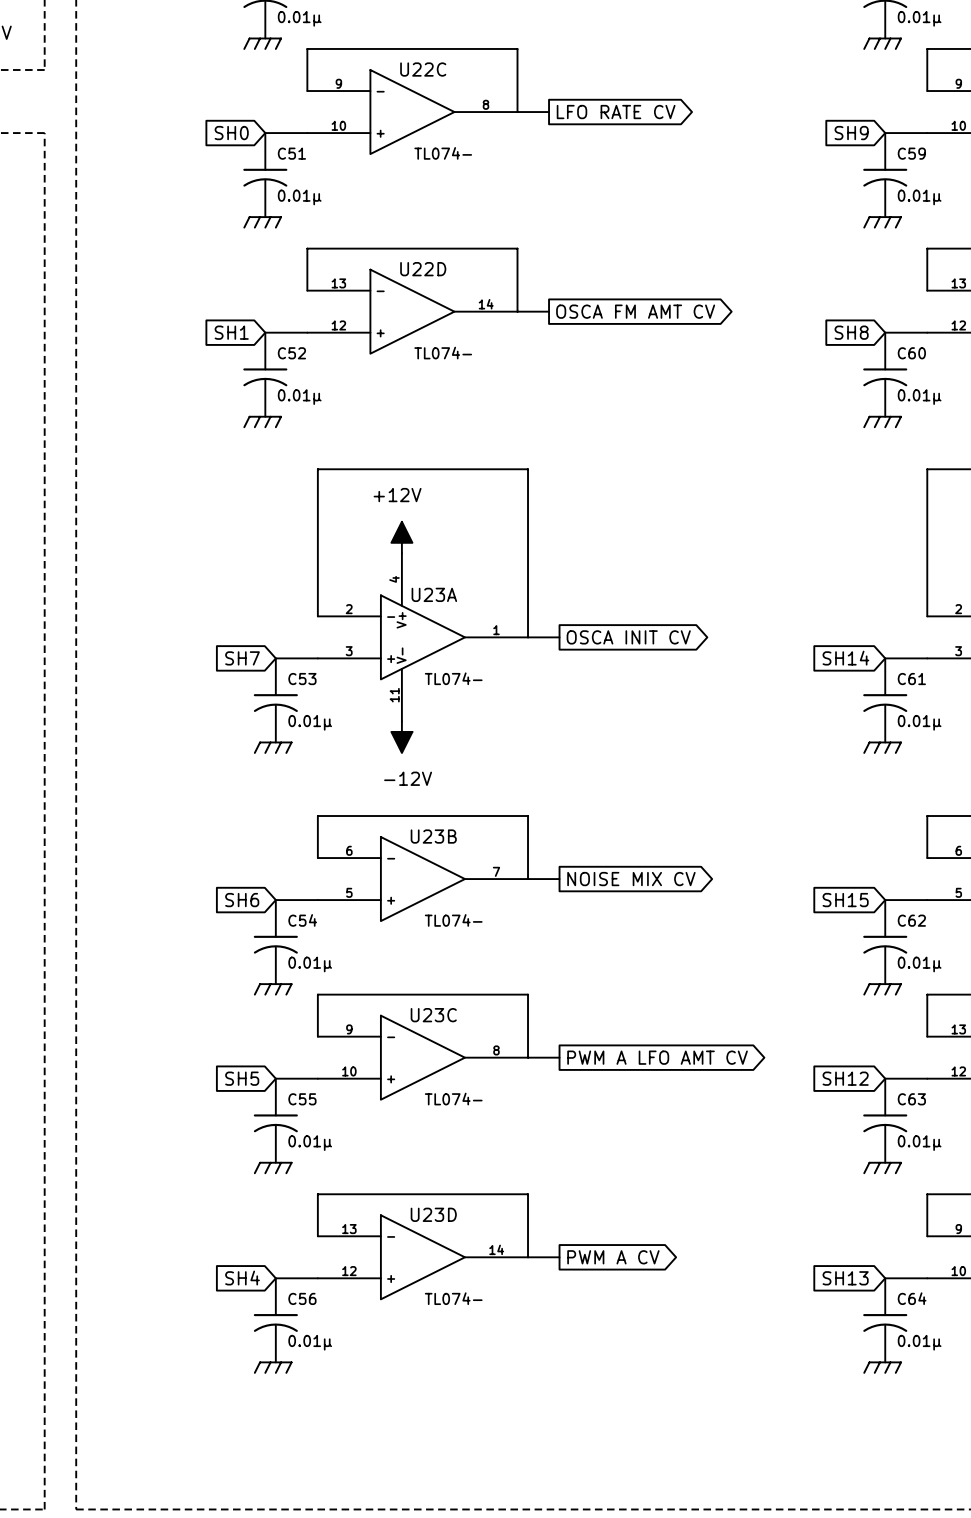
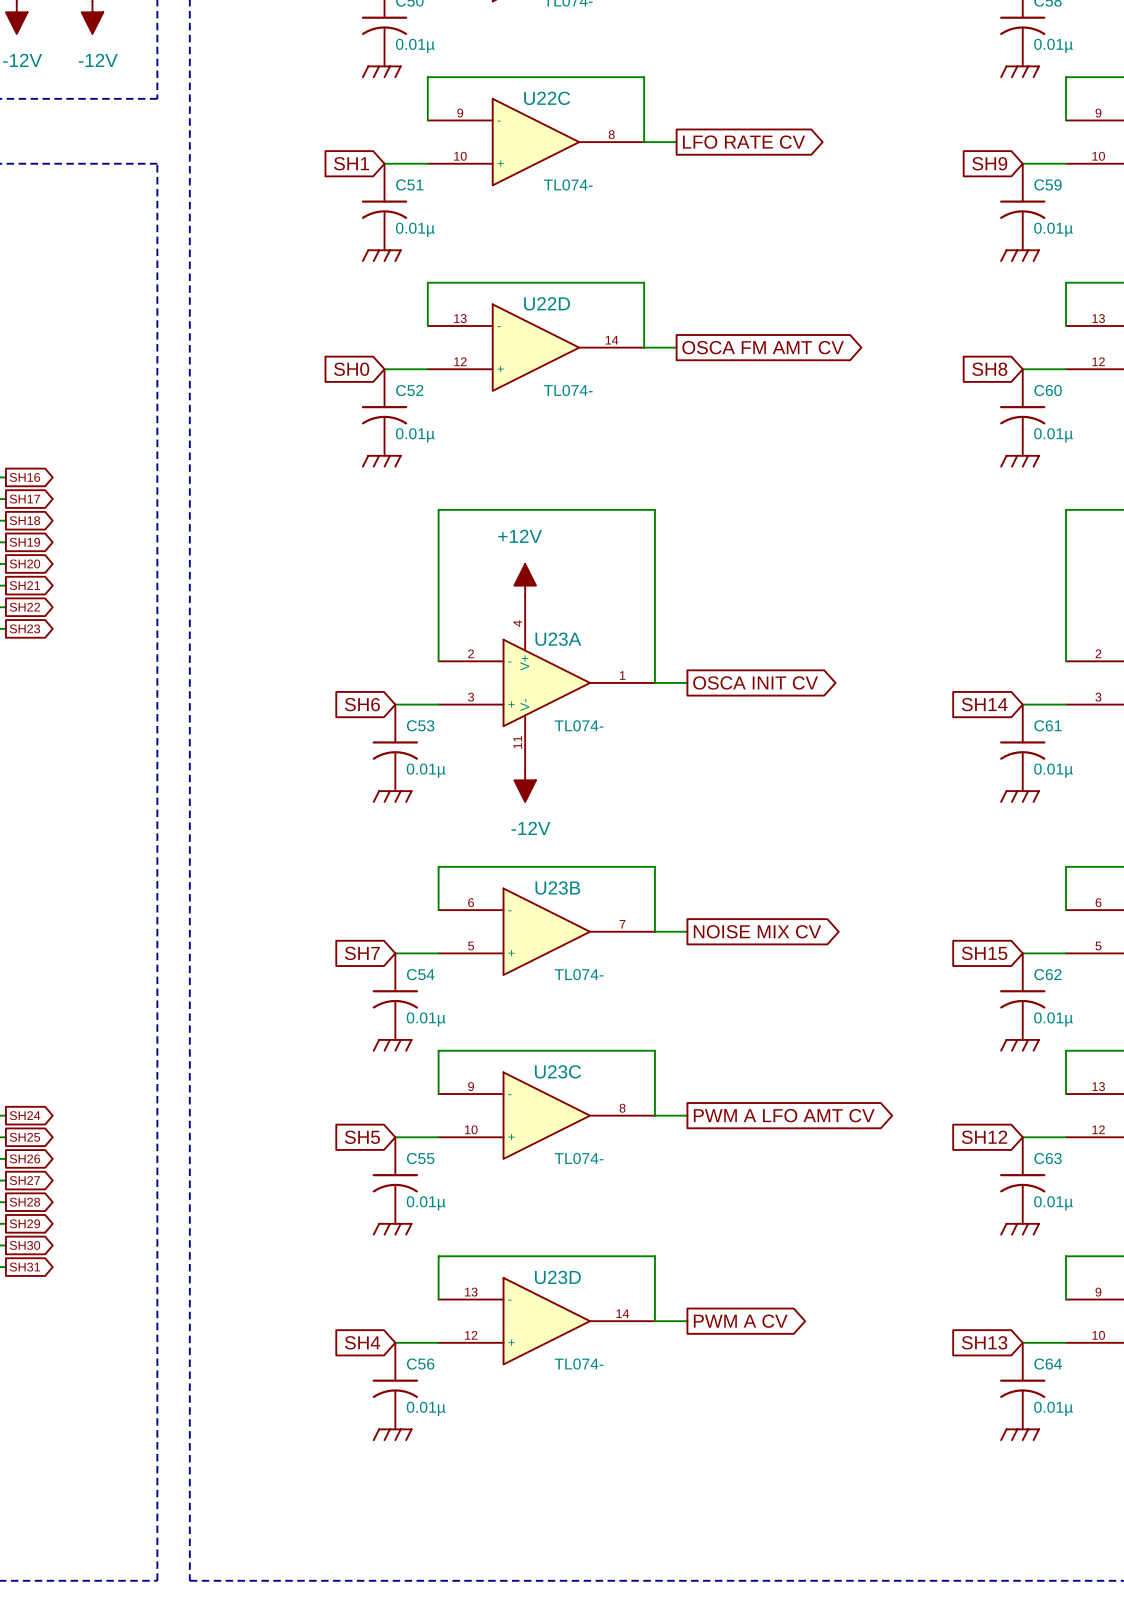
global label: SH0 (231, 133) -> SH1 (351, 163)
global label: SH1 (231, 332) -> SH0 (351, 369)
global label: SH7 (242, 658) -> SH6 (362, 704)
global label: SH6 (242, 900) -> SH7 (362, 953)

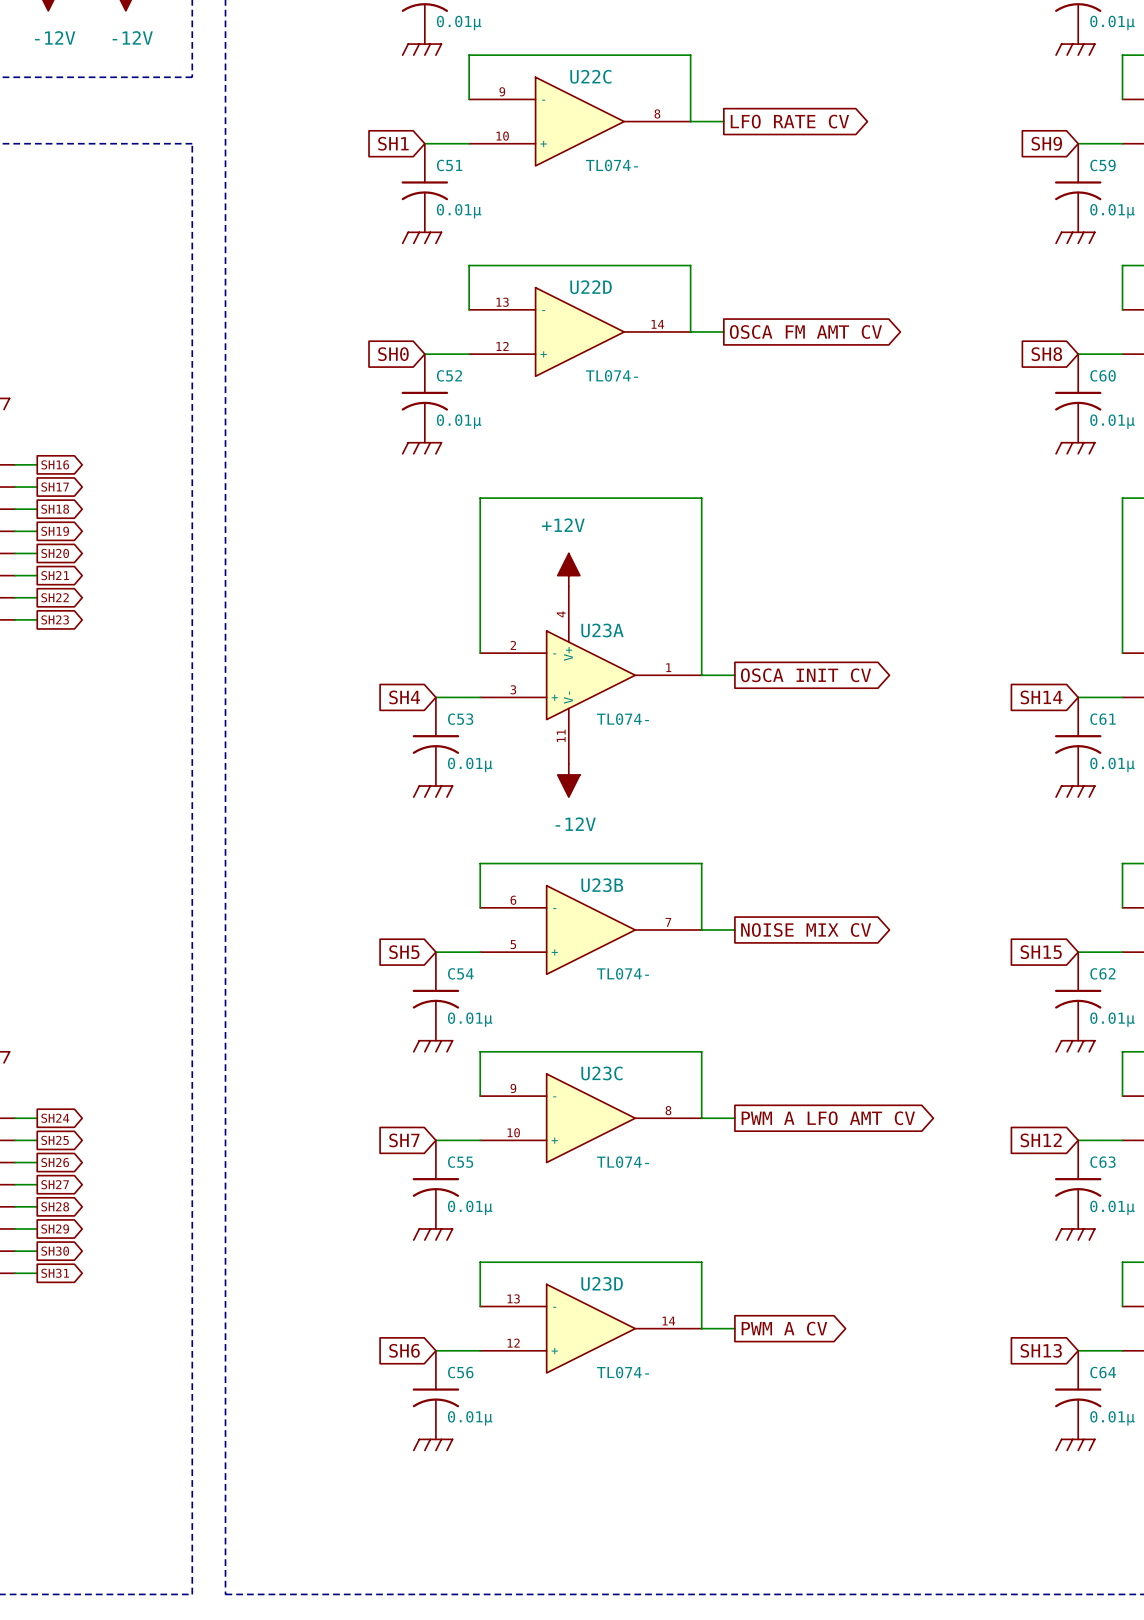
global label: SH6 (362, 704) -> SH4 (404, 697)
global label: SH7 (362, 953) -> SH5 (404, 952)
global label: SH5 (362, 1137) -> SH7 (404, 1140)
global label: SH4 (362, 1342) -> SH6 (404, 1350)

